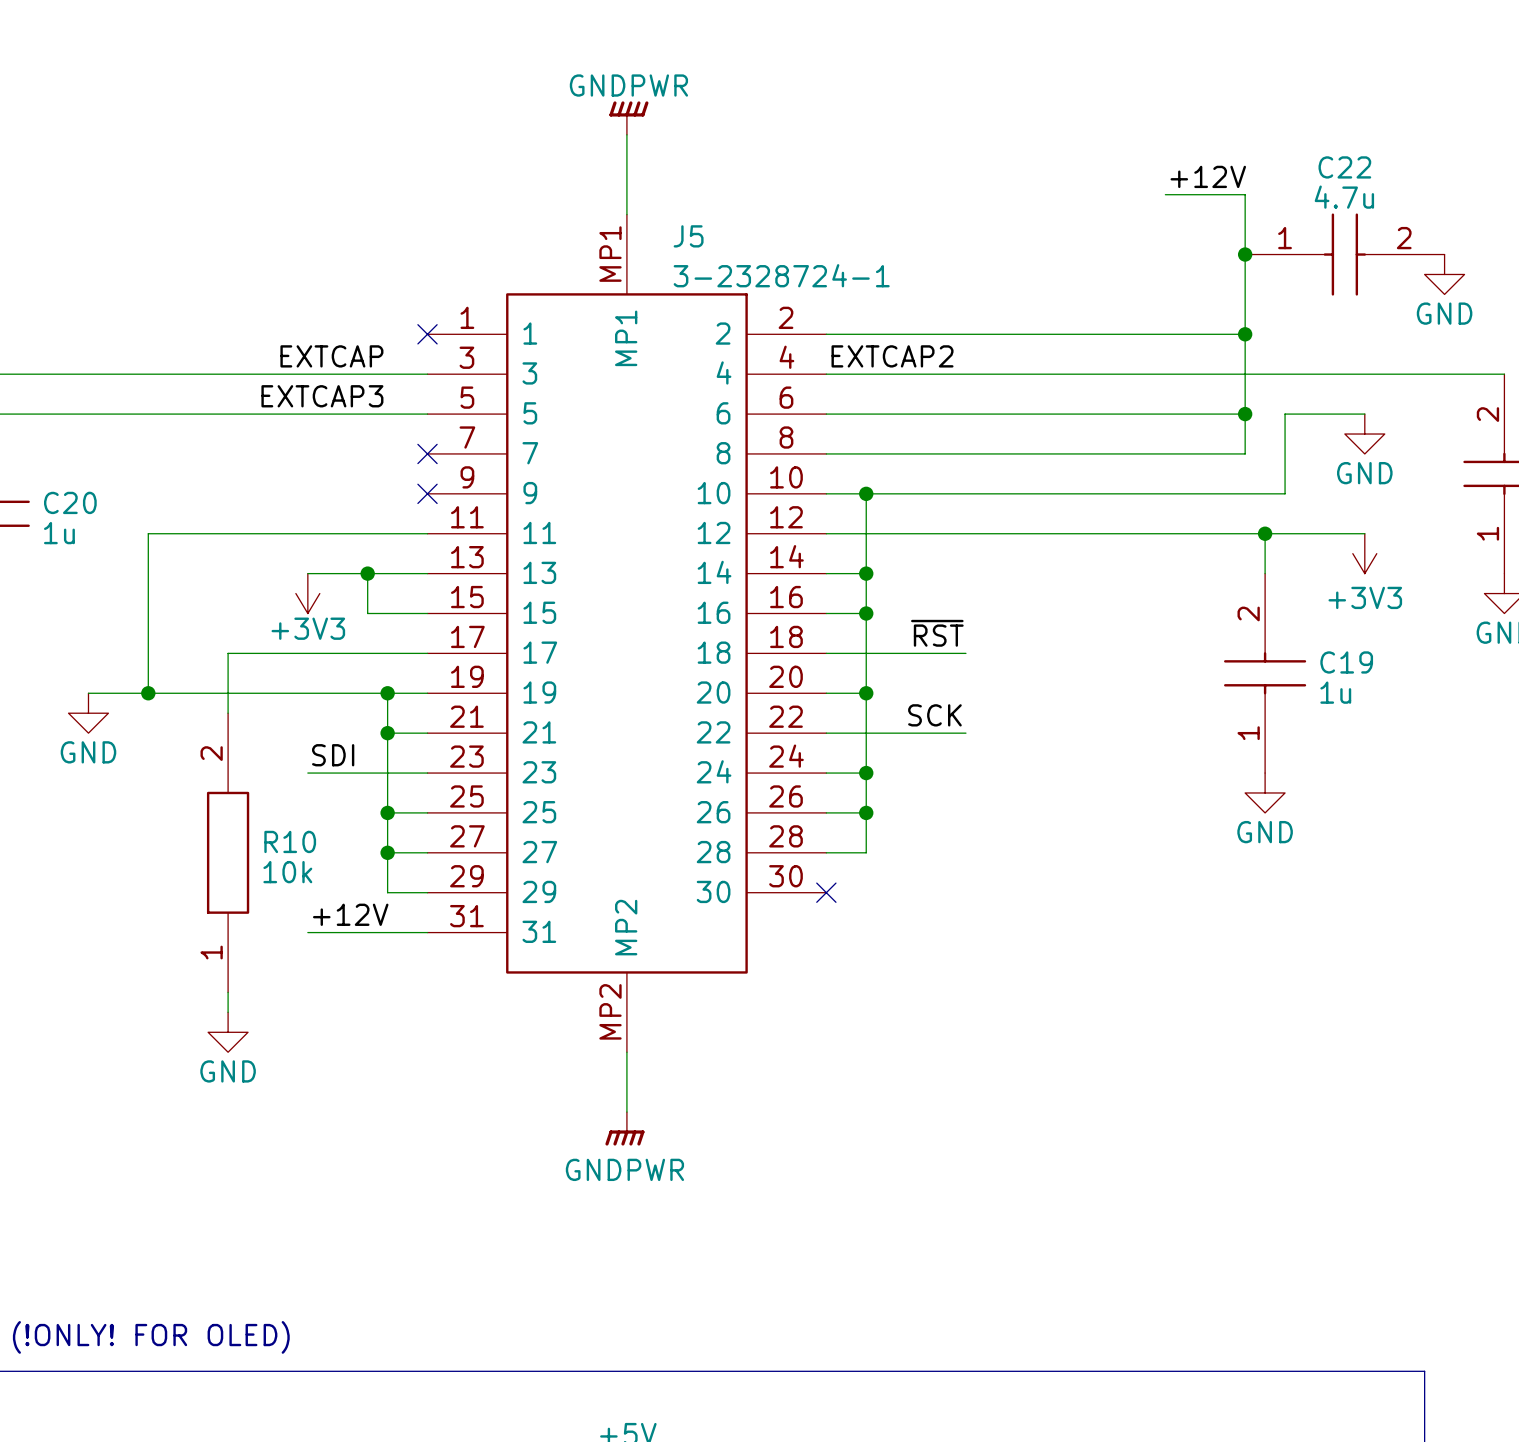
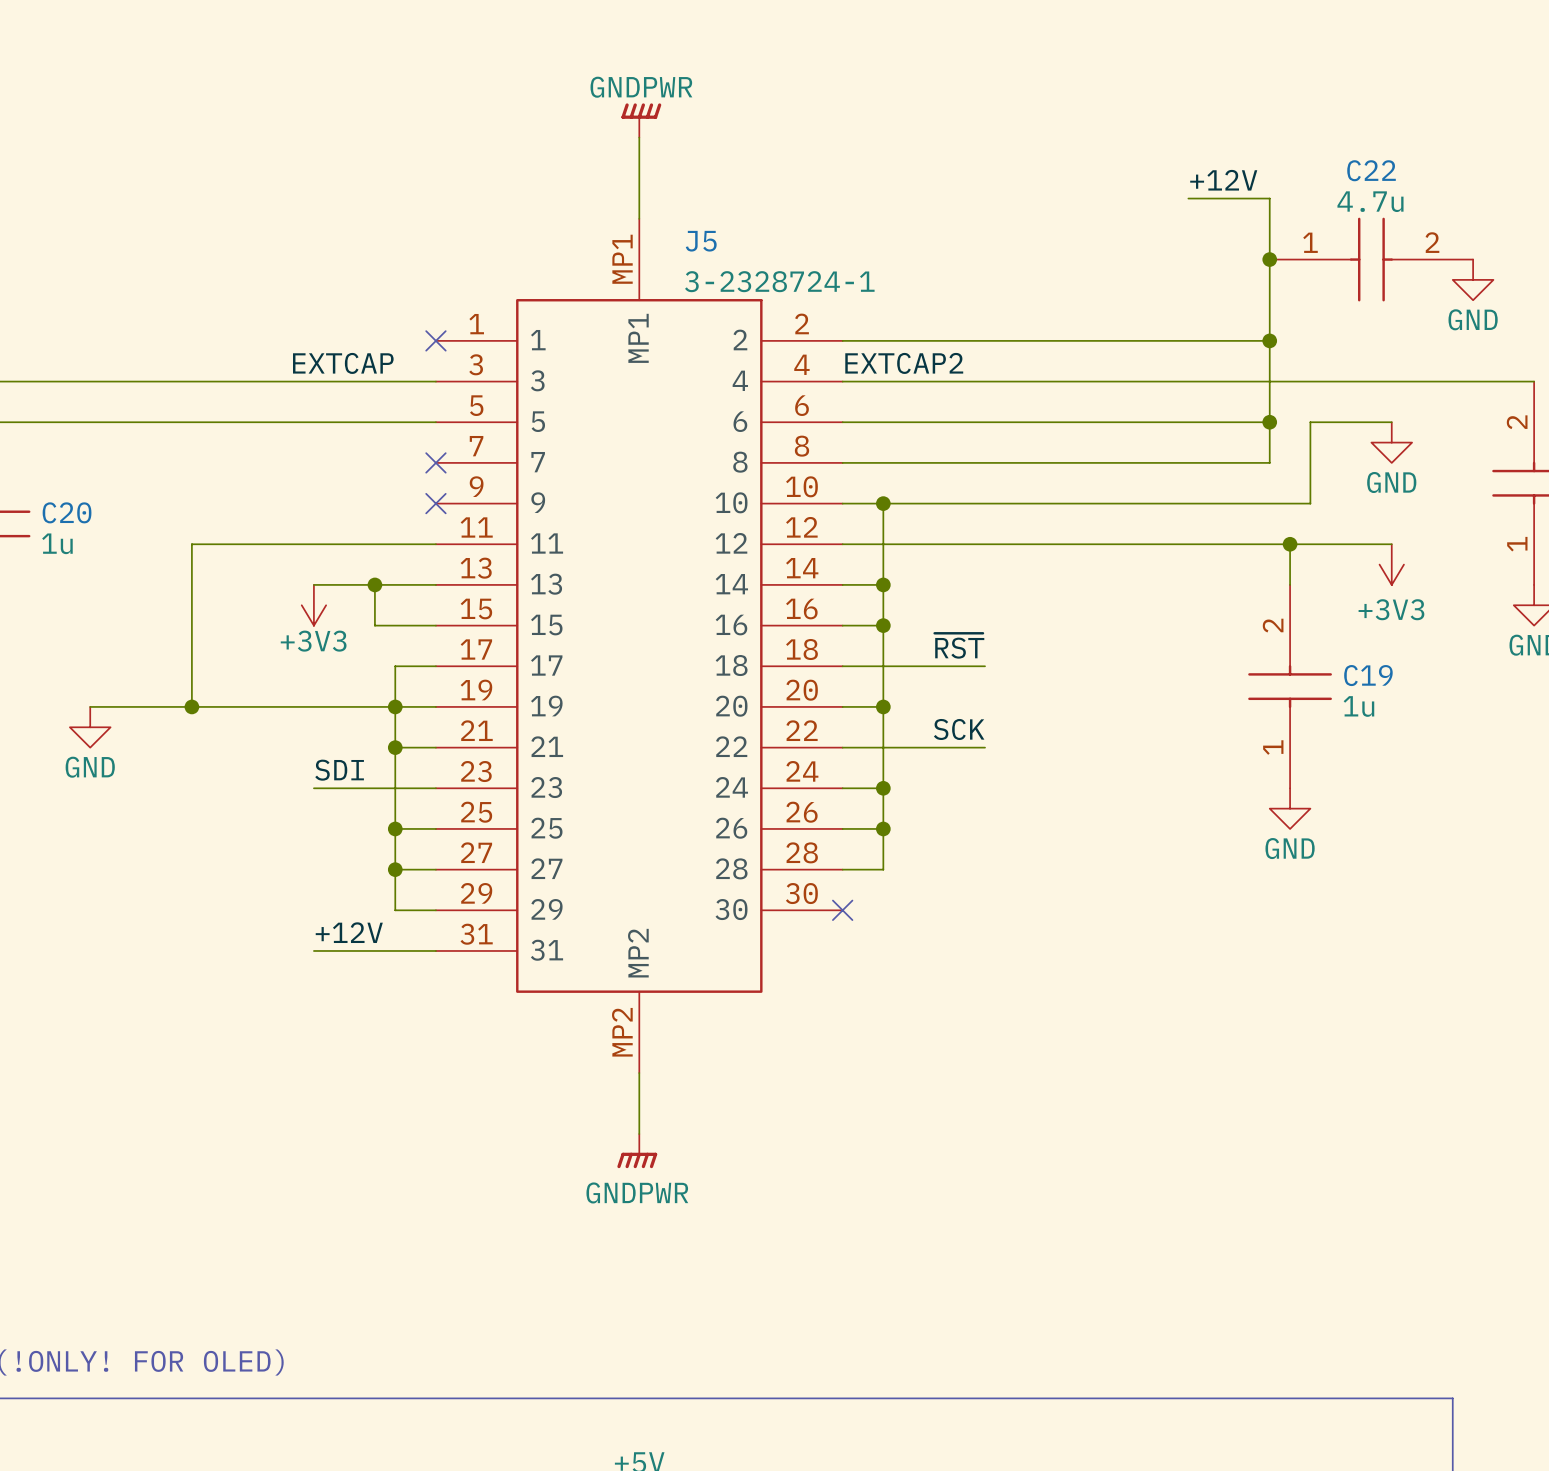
label: EXTCAP3 (322, 396) -> none
wire: (188, 533) (148, 533) (148, 693) -> (191, 544) (191, 706)
wire: (387, 653) (228, 653) (228, 713) -> (395, 666) (395, 706)
junction position: (148, 693) -> (191, 706)
R10: 10k (228, 852) -> none
wire: (228, 992) (228, 1012) -> none
power symbol: GND (228, 1032) -> none

